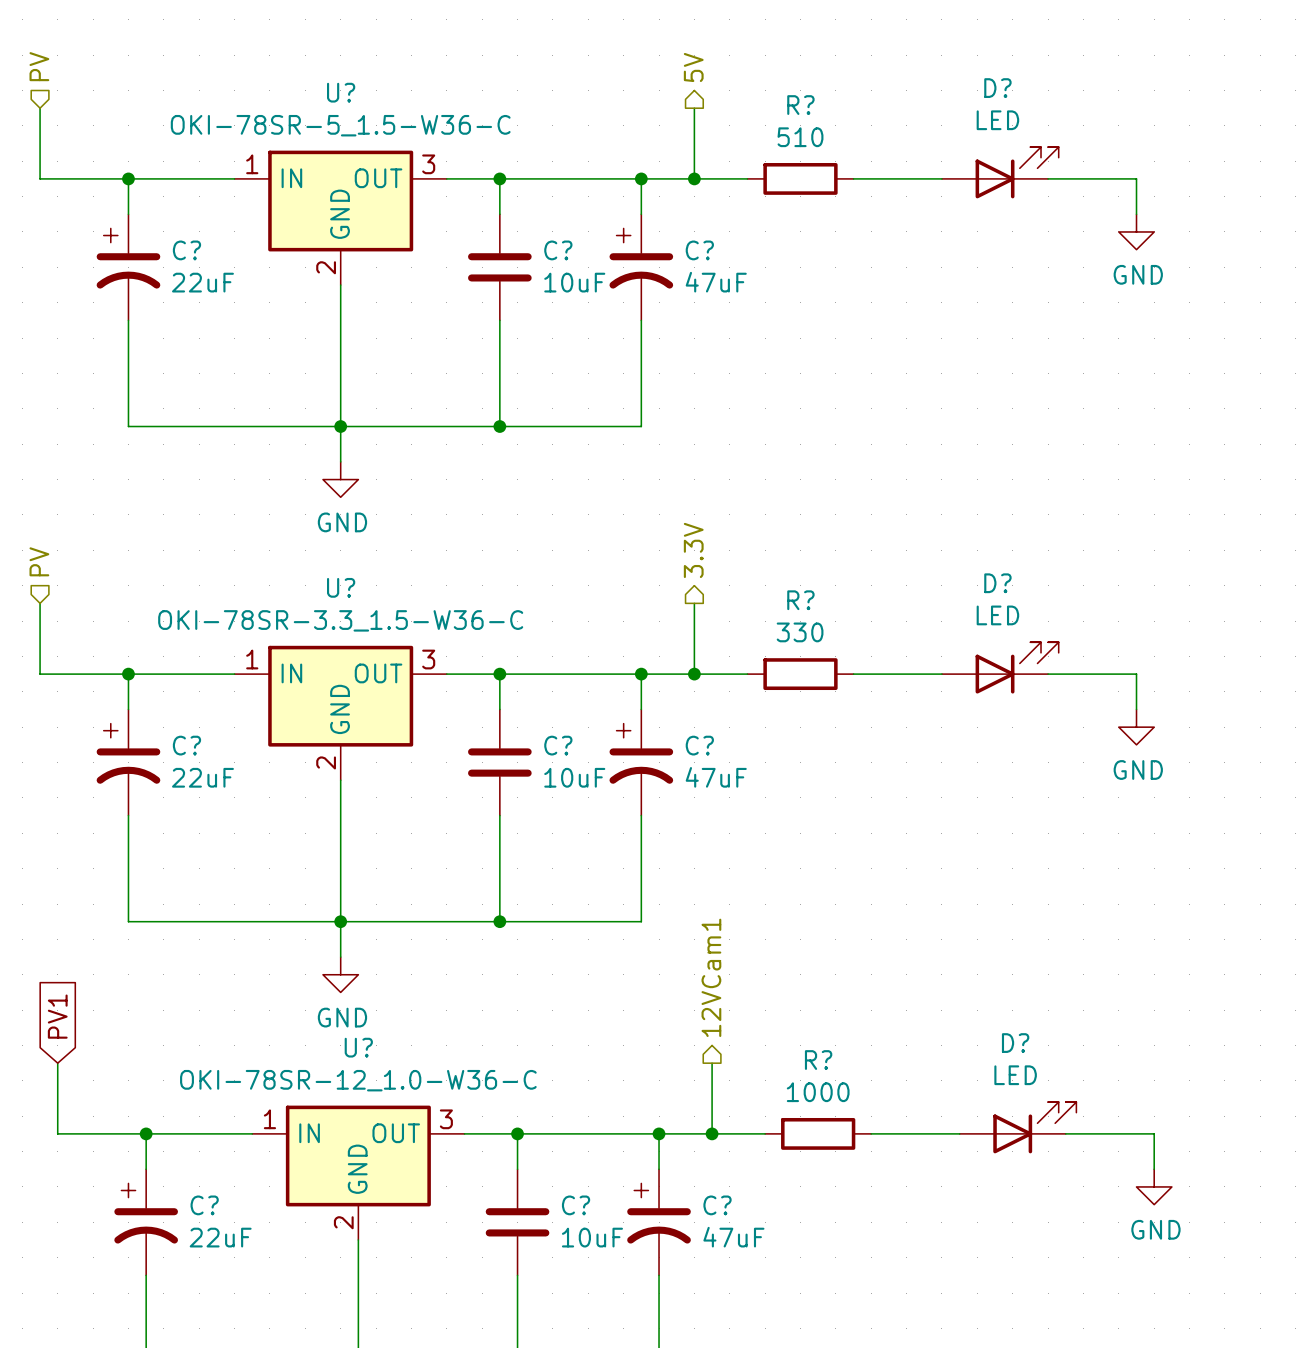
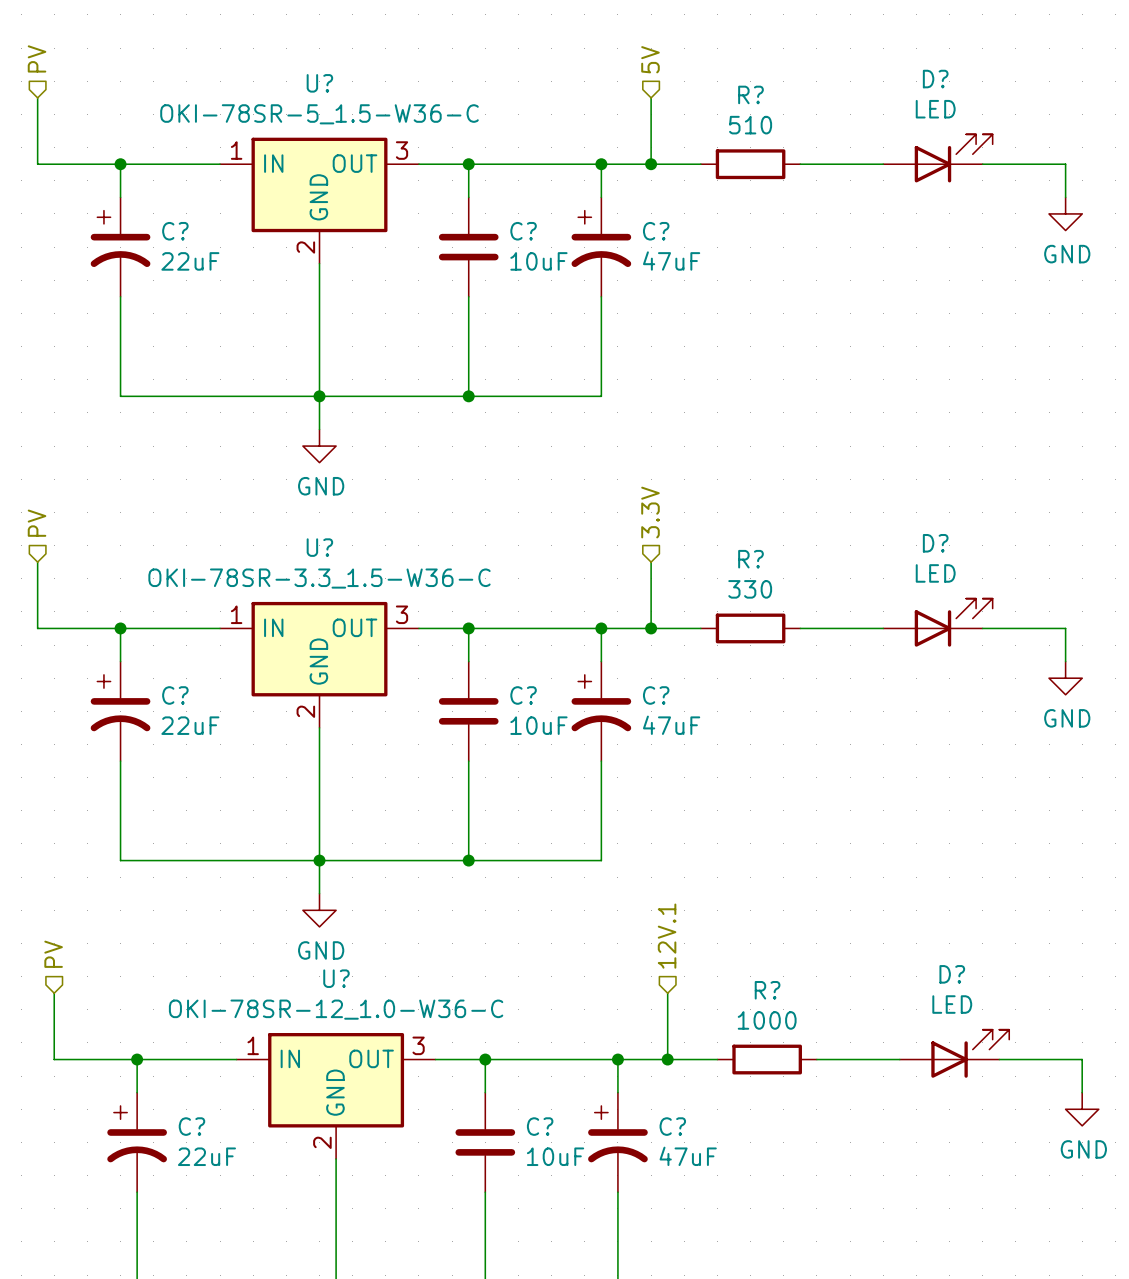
hierarchical label shape: output (693, 67) -> input (650, 59)
hierarchical label shape: output (693, 550) -> input (650, 512)
hierarchical label shape: output (711, 977) -> input (667, 936)
hierarchical label: 12VCam1 (711, 977) -> 12V.1 (667, 936)
global label: PV1 (57, 1016) -> none
hierarchical label: none -> PV (53, 954)

